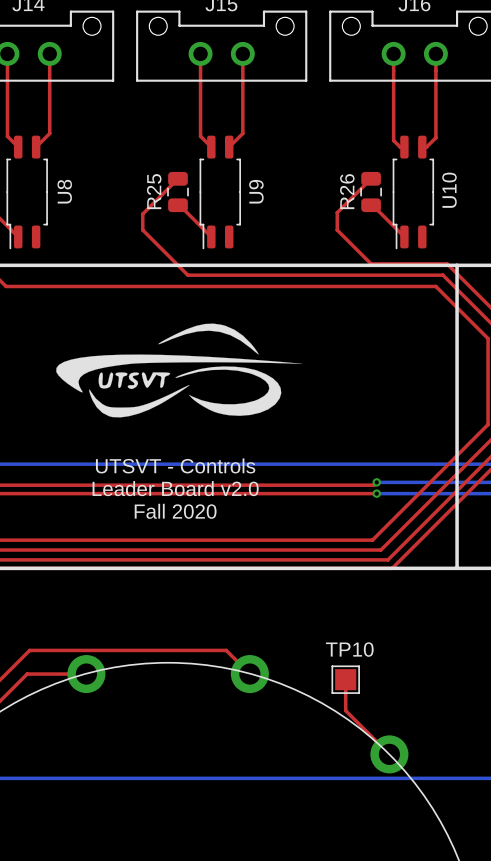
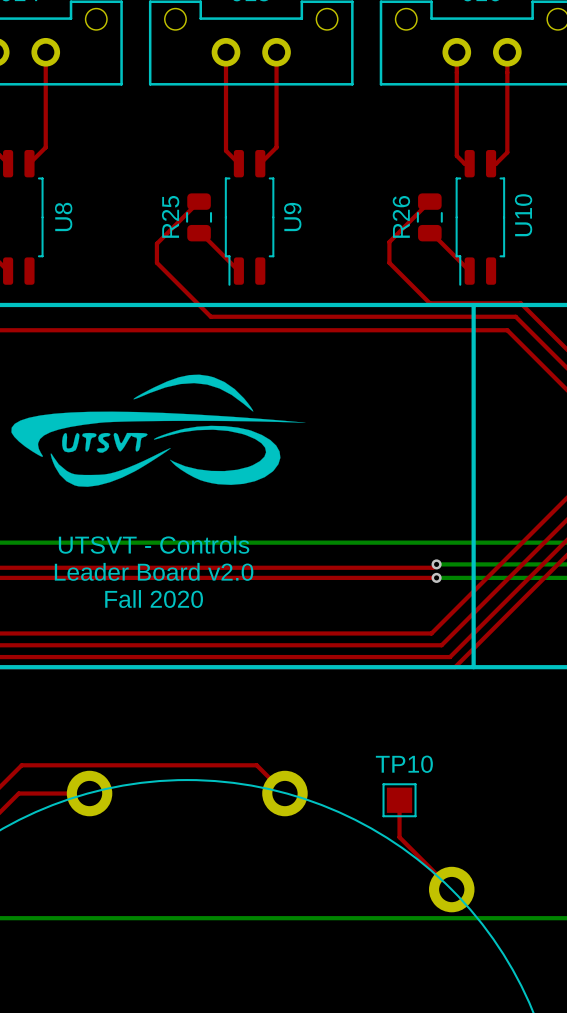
line: (457, 265) (457, 568) -> (473, 304) (473, 667)
drawing position: (179, 370) -> (158, 430)
text position: UTSVT - Controls (175, 465) -> UTSVT - Controls (154, 544)
text position: Leader Board v2.0 (175, 488) -> Leader Board v2.0 (154, 571)
text position: Fall 2020 (175, 511) -> Fall 2020 (154, 599)

